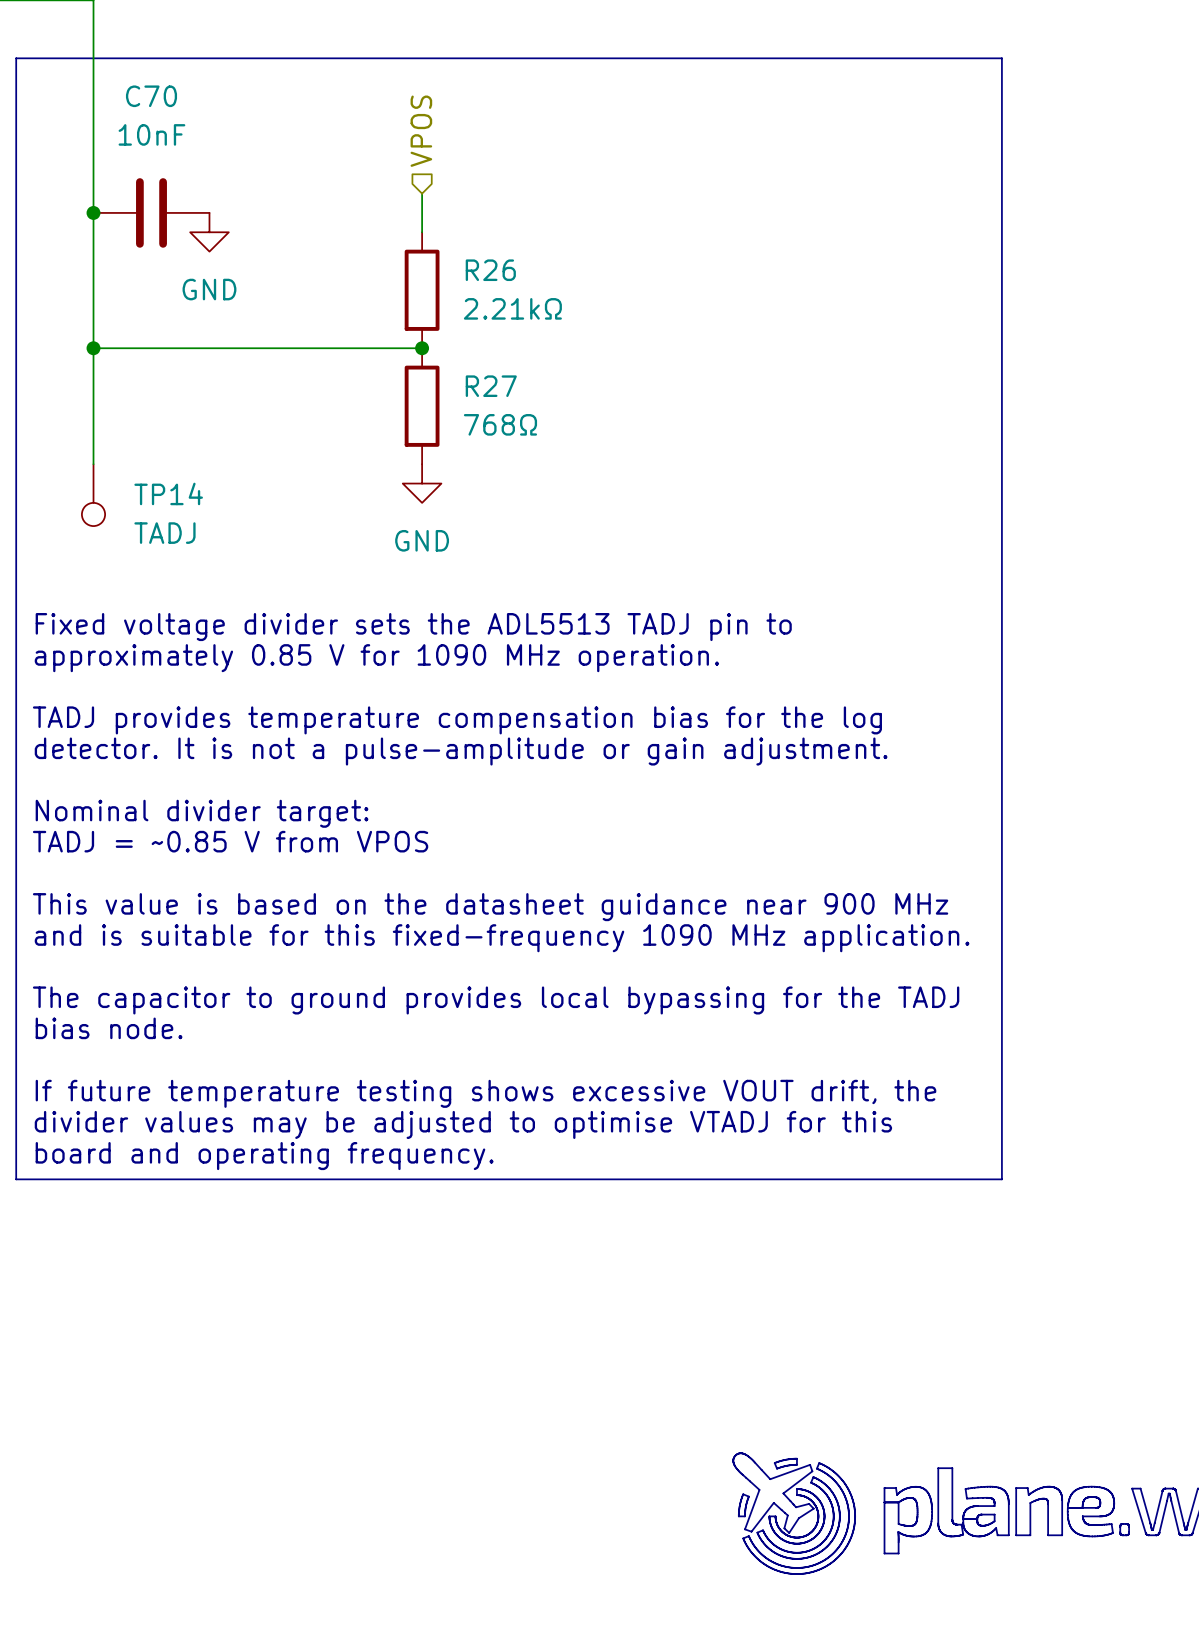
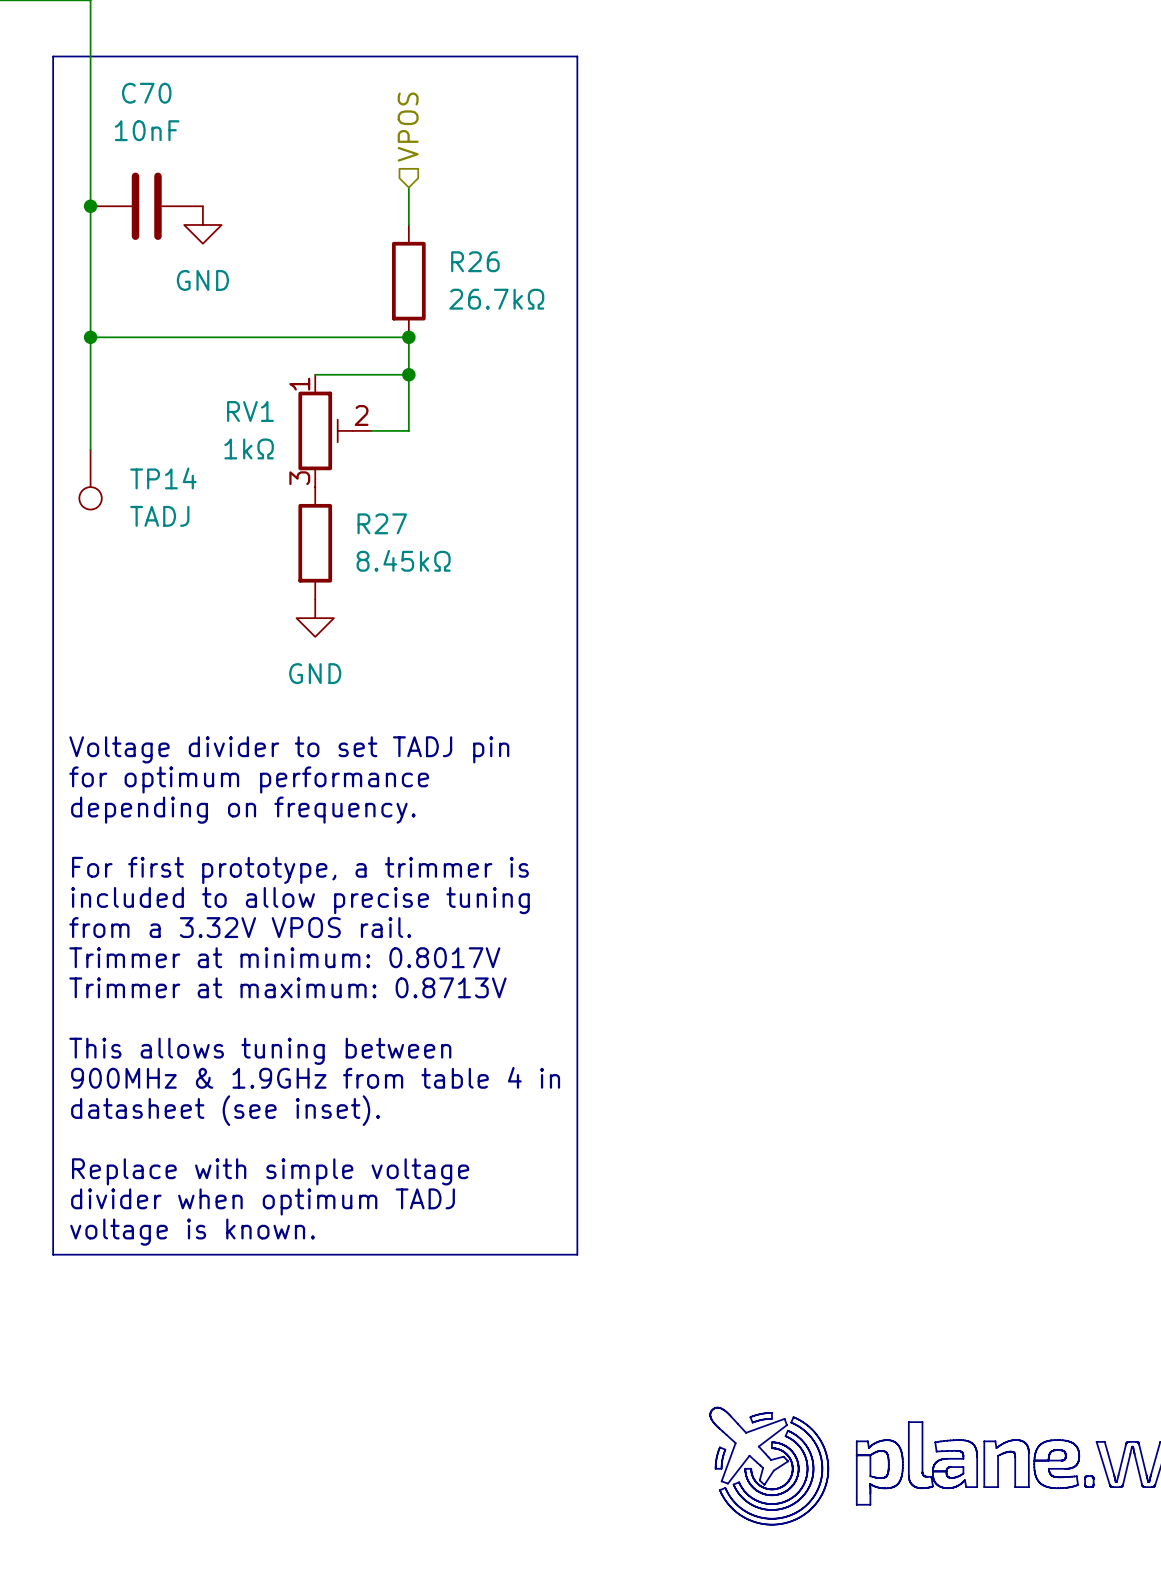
line: (54, 58) (16, 58) (16, 1179) (1001, 1179) (1001, 58) (596, 58) -> (53, 56) (53, 1254) (577, 1254) (577, 56)
R26 value: 2.21kΩ (512, 308) -> 26.7kΩ (496, 299)
wire: none -> (408, 337) (408, 430) (371, 430)
wire: none -> (315, 374) (408, 374)
junction: none -> (408, 374)
R27 position: (422, 406) -> (315, 543)
R27 value: 768Ω (500, 424) -> 8.45kΩ (403, 560)
RV1: none -> 1kΩ (334, 430)
power symbol position: GND (422, 483) -> GND (315, 618)
text: Fixed voltage divider sets the ADL5513 TADJ pin to (413, 627) -> none
text: approximately 0.85 V for 1090 MHz operation. (376, 658) -> none
text: TADJ provides temperature compensation bias for the log (457, 720) -> none
text: detector. It is not a pulse-amplitude or gain adjustment. (461, 751) -> none
text: none -> Voltage divider to set TADJ pin (289, 749)
text: none -> for optimum performance (249, 779)
text: Nominal divider target: (202, 813) -> none
text: none -> depending on frequency. (243, 810)
text: TADJ = ~0.85 V from VPOS (230, 841) -> none
text: none -> For first prototype, a trimmer is (300, 870)
text: This value is based on the datasheet guidance near 900 MHz (490, 907) -> none
text: none -> included to allow precise tuning (300, 900)
text: and is suitable for this fixed-frequency 1090 MHz application. (502, 938) -> none
text: none -> from a 3.32V VPOS rail. (240, 927)
text: none -> Trimmer at minimum: 0.8017V (284, 957)
text: The capacitor to ground provides local bypassing for the TADJ (496, 1000) -> none
text: none -> Trimmer at maximum: 0.8713V (287, 987)
text: bias node. (109, 1028) -> none
text: none -> This allows tuning between (260, 1051)
text: If future temperature testing shows excessive VOUT drift, the (485, 1093) -> none
text: none -> 900MHz & 1.9GHz from table 4 in (315, 1077)
text: divider values may be adjusted to optimise VTADJ for this (463, 1124) -> none
text: none -> datasheet (see inset). (225, 1110)
text: board and operating frequency. (264, 1156) -> none
text: none -> Replace with simple voltage (270, 1171)
text: none -> divider when optimum TADJ (263, 1201)
text: none -> voltage is known. (192, 1232)

